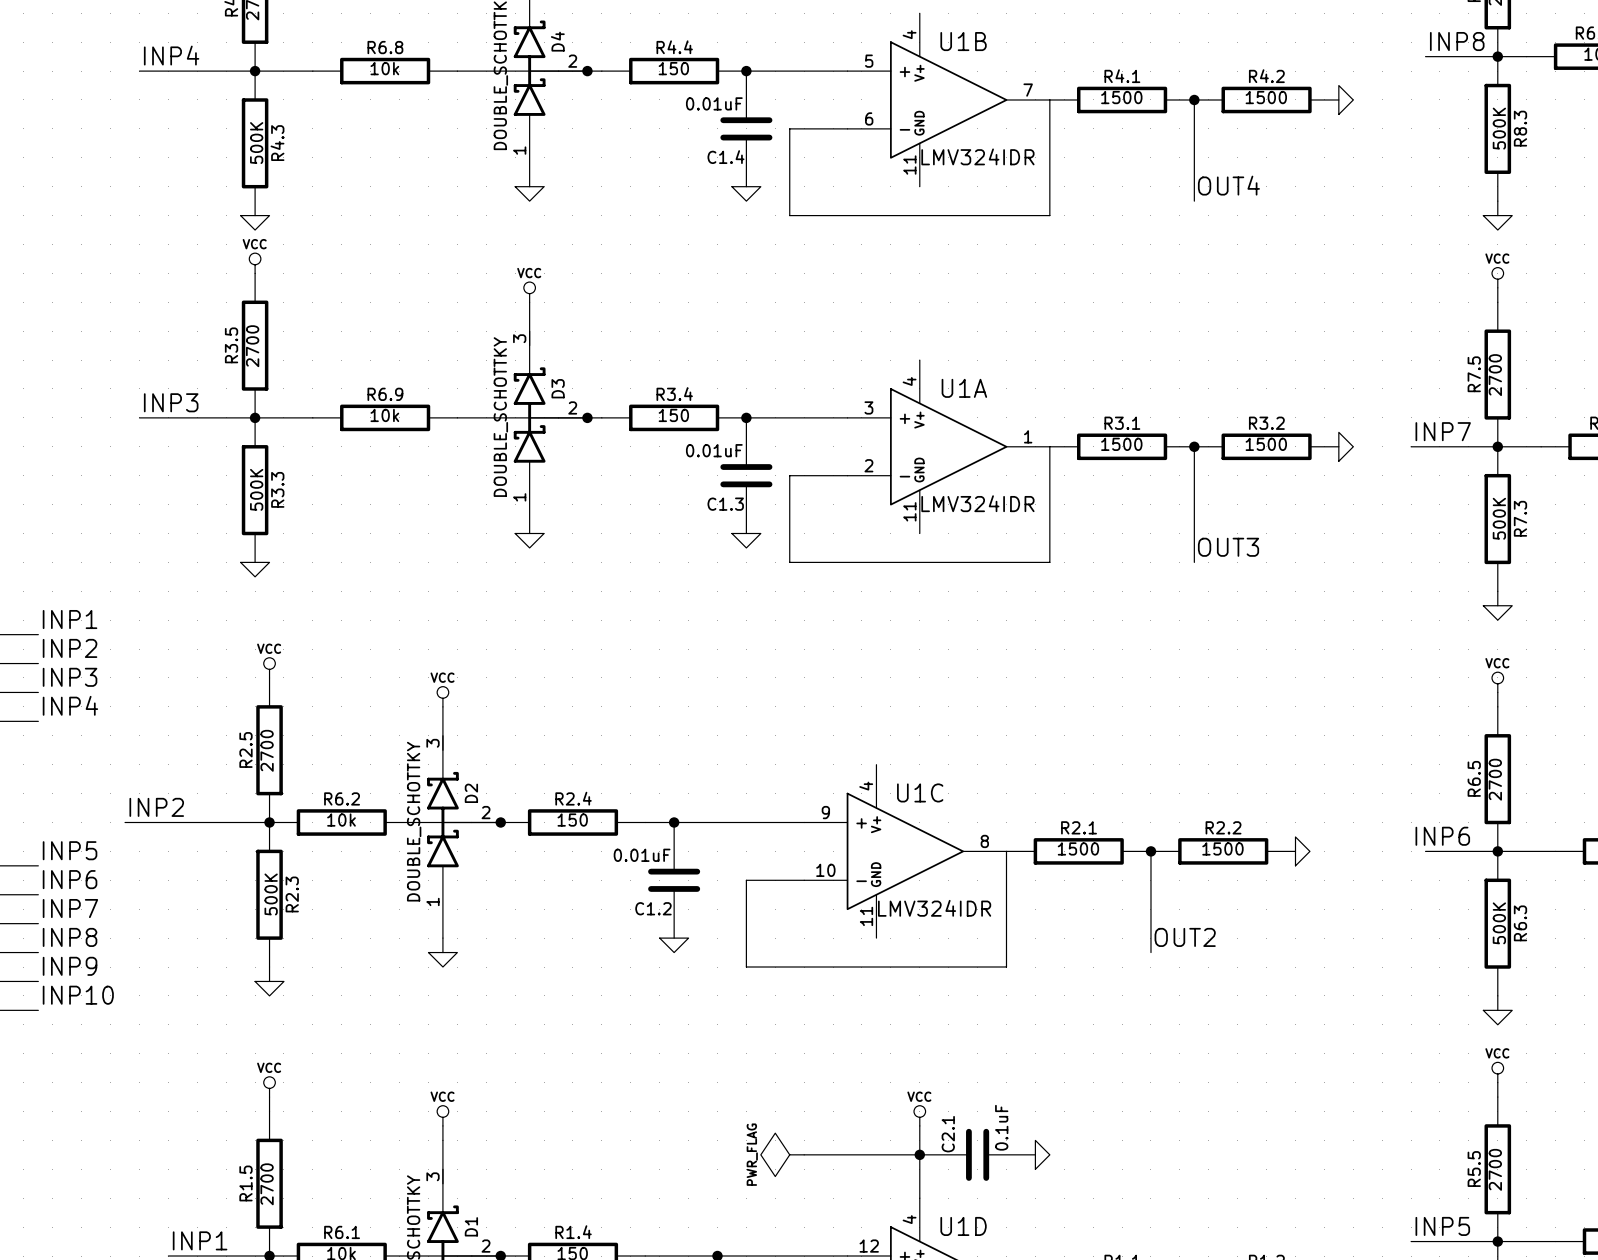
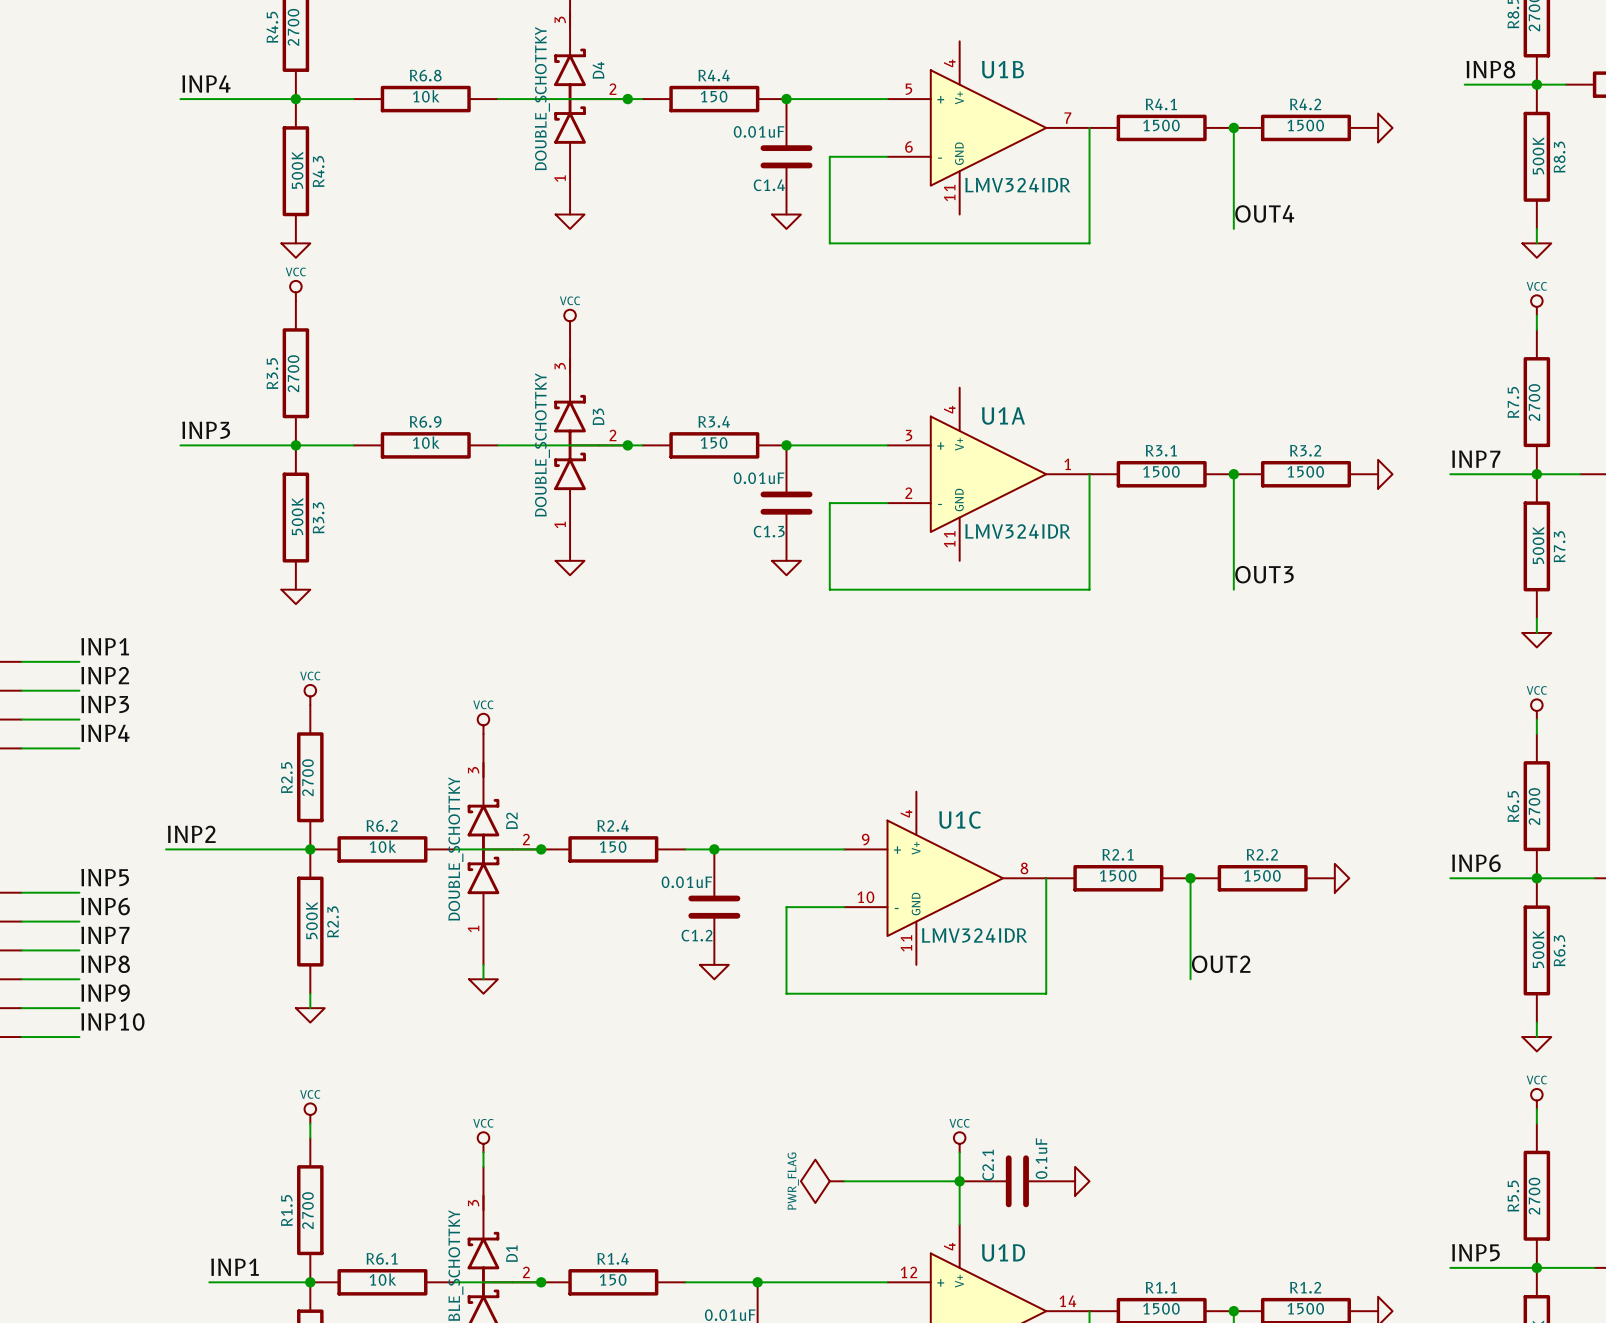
wire: none -> (1450, 878) (1464, 878)

